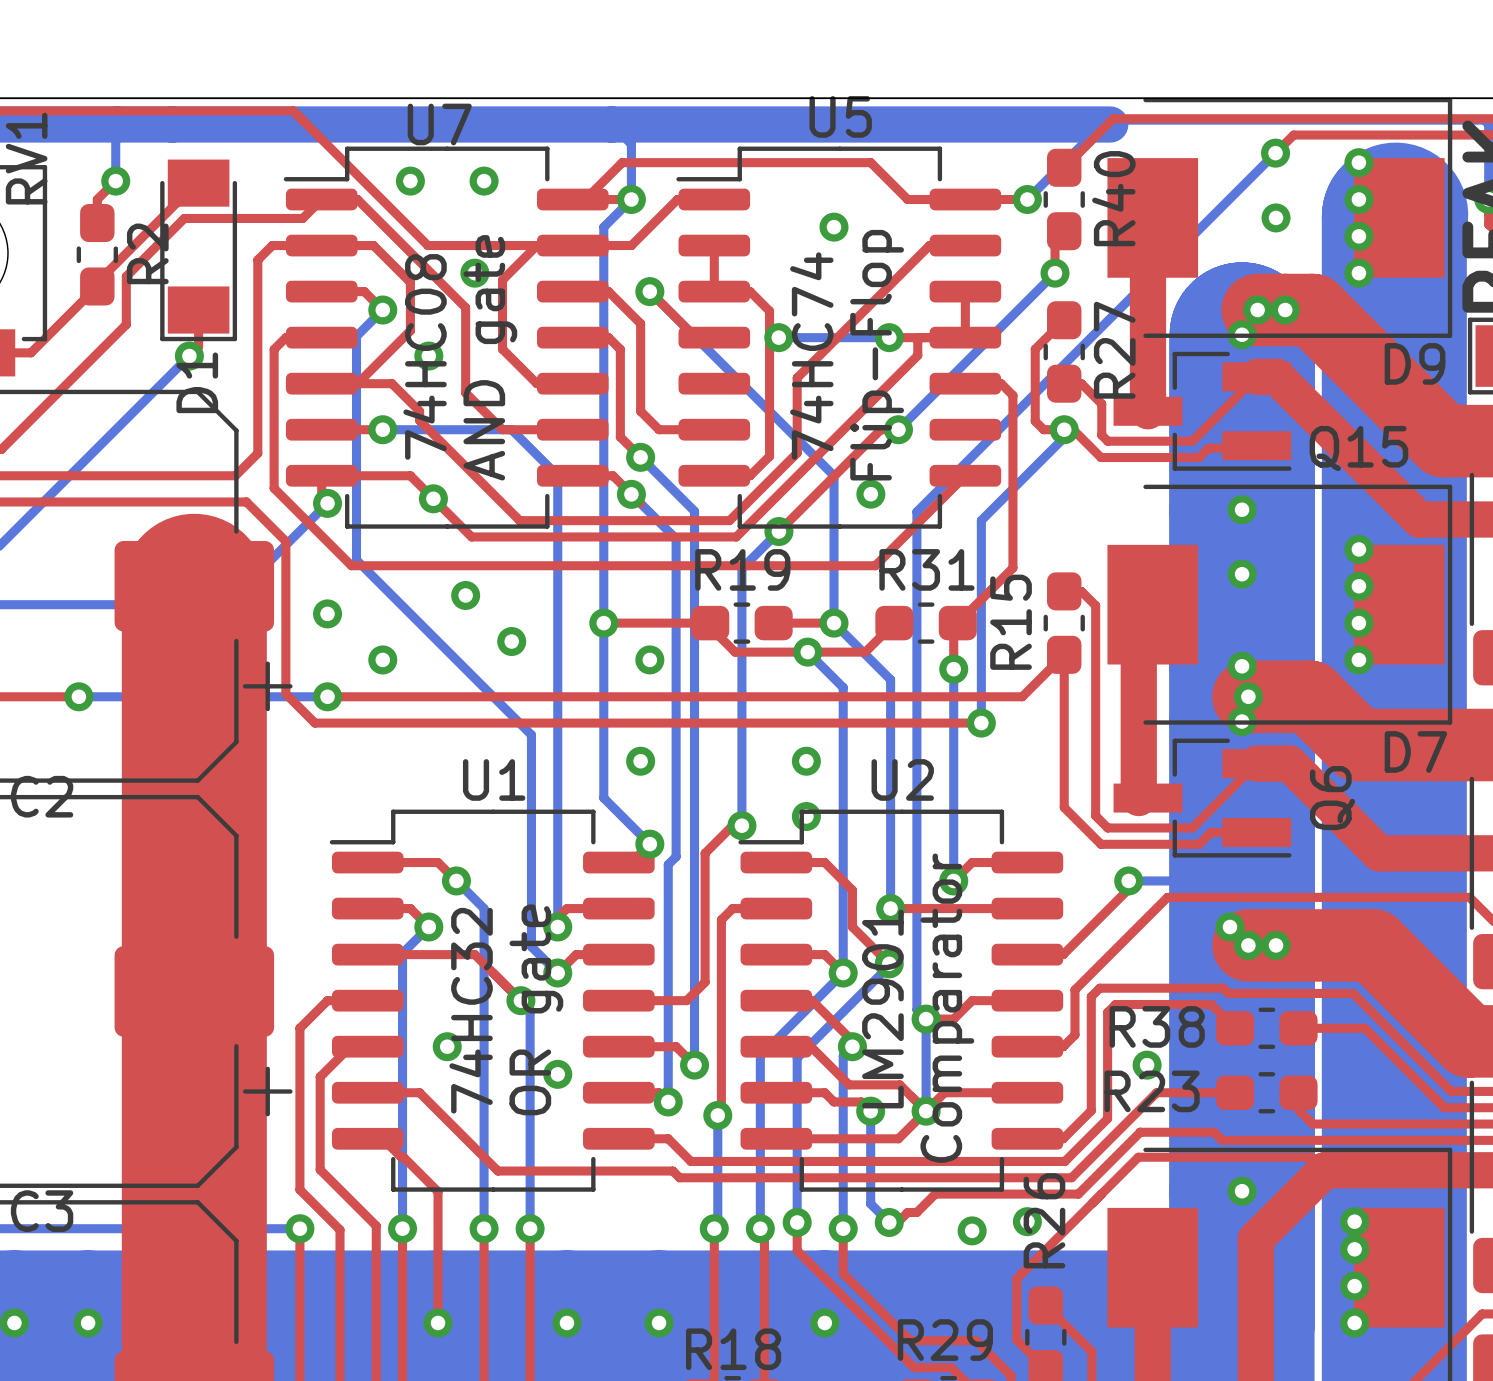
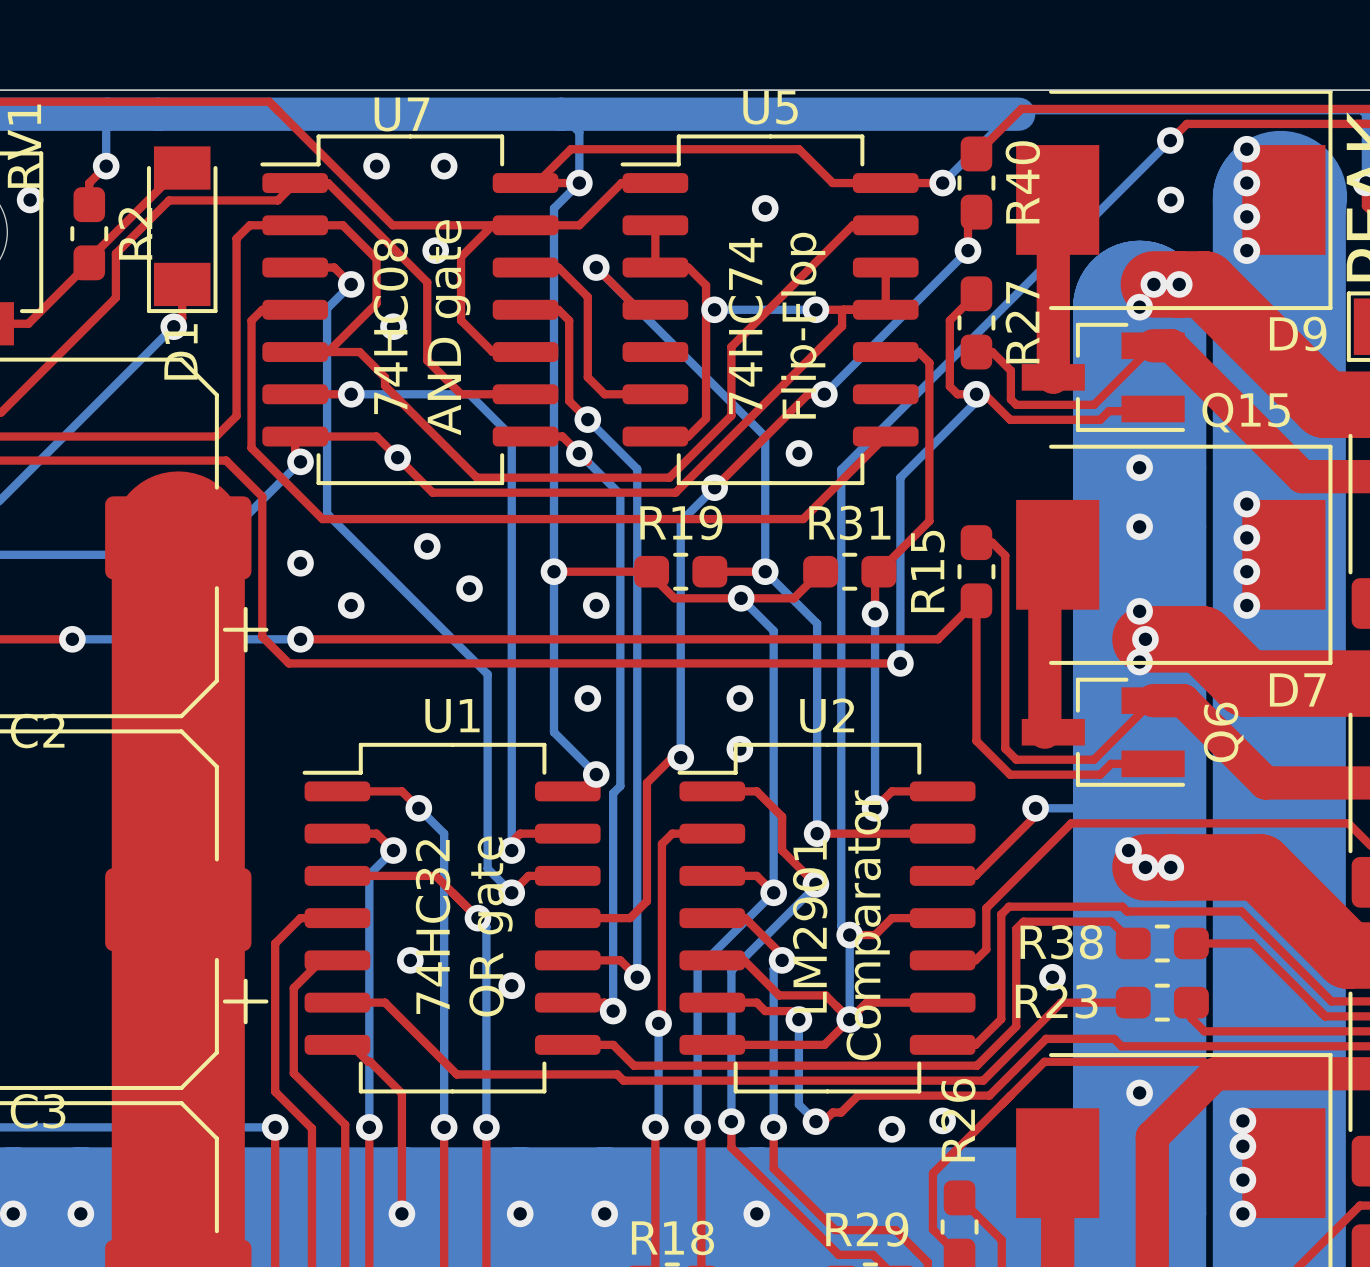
via: none -> (30, 199)

